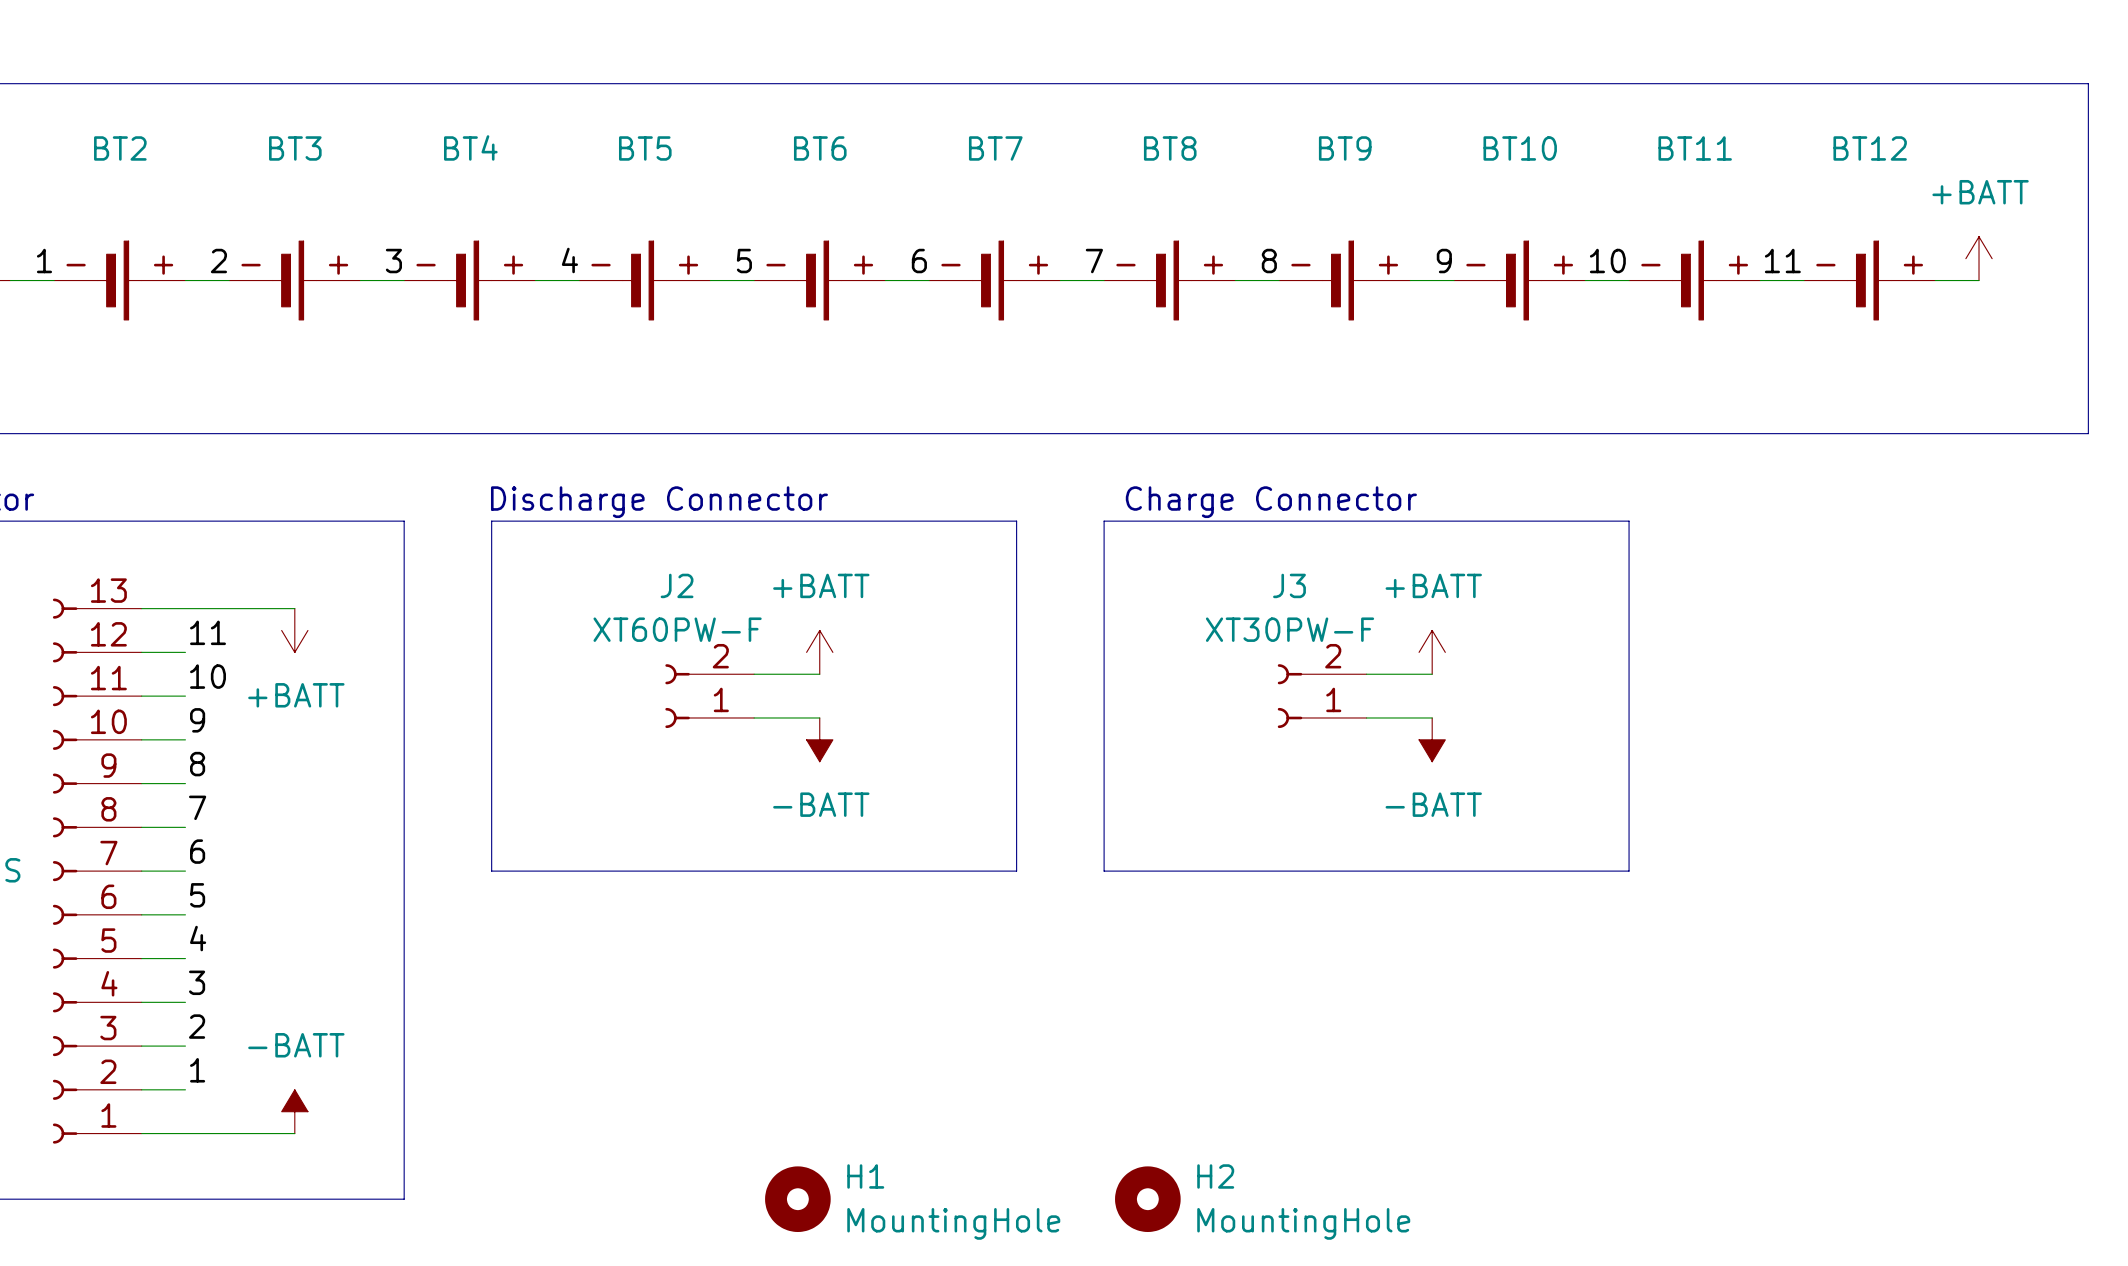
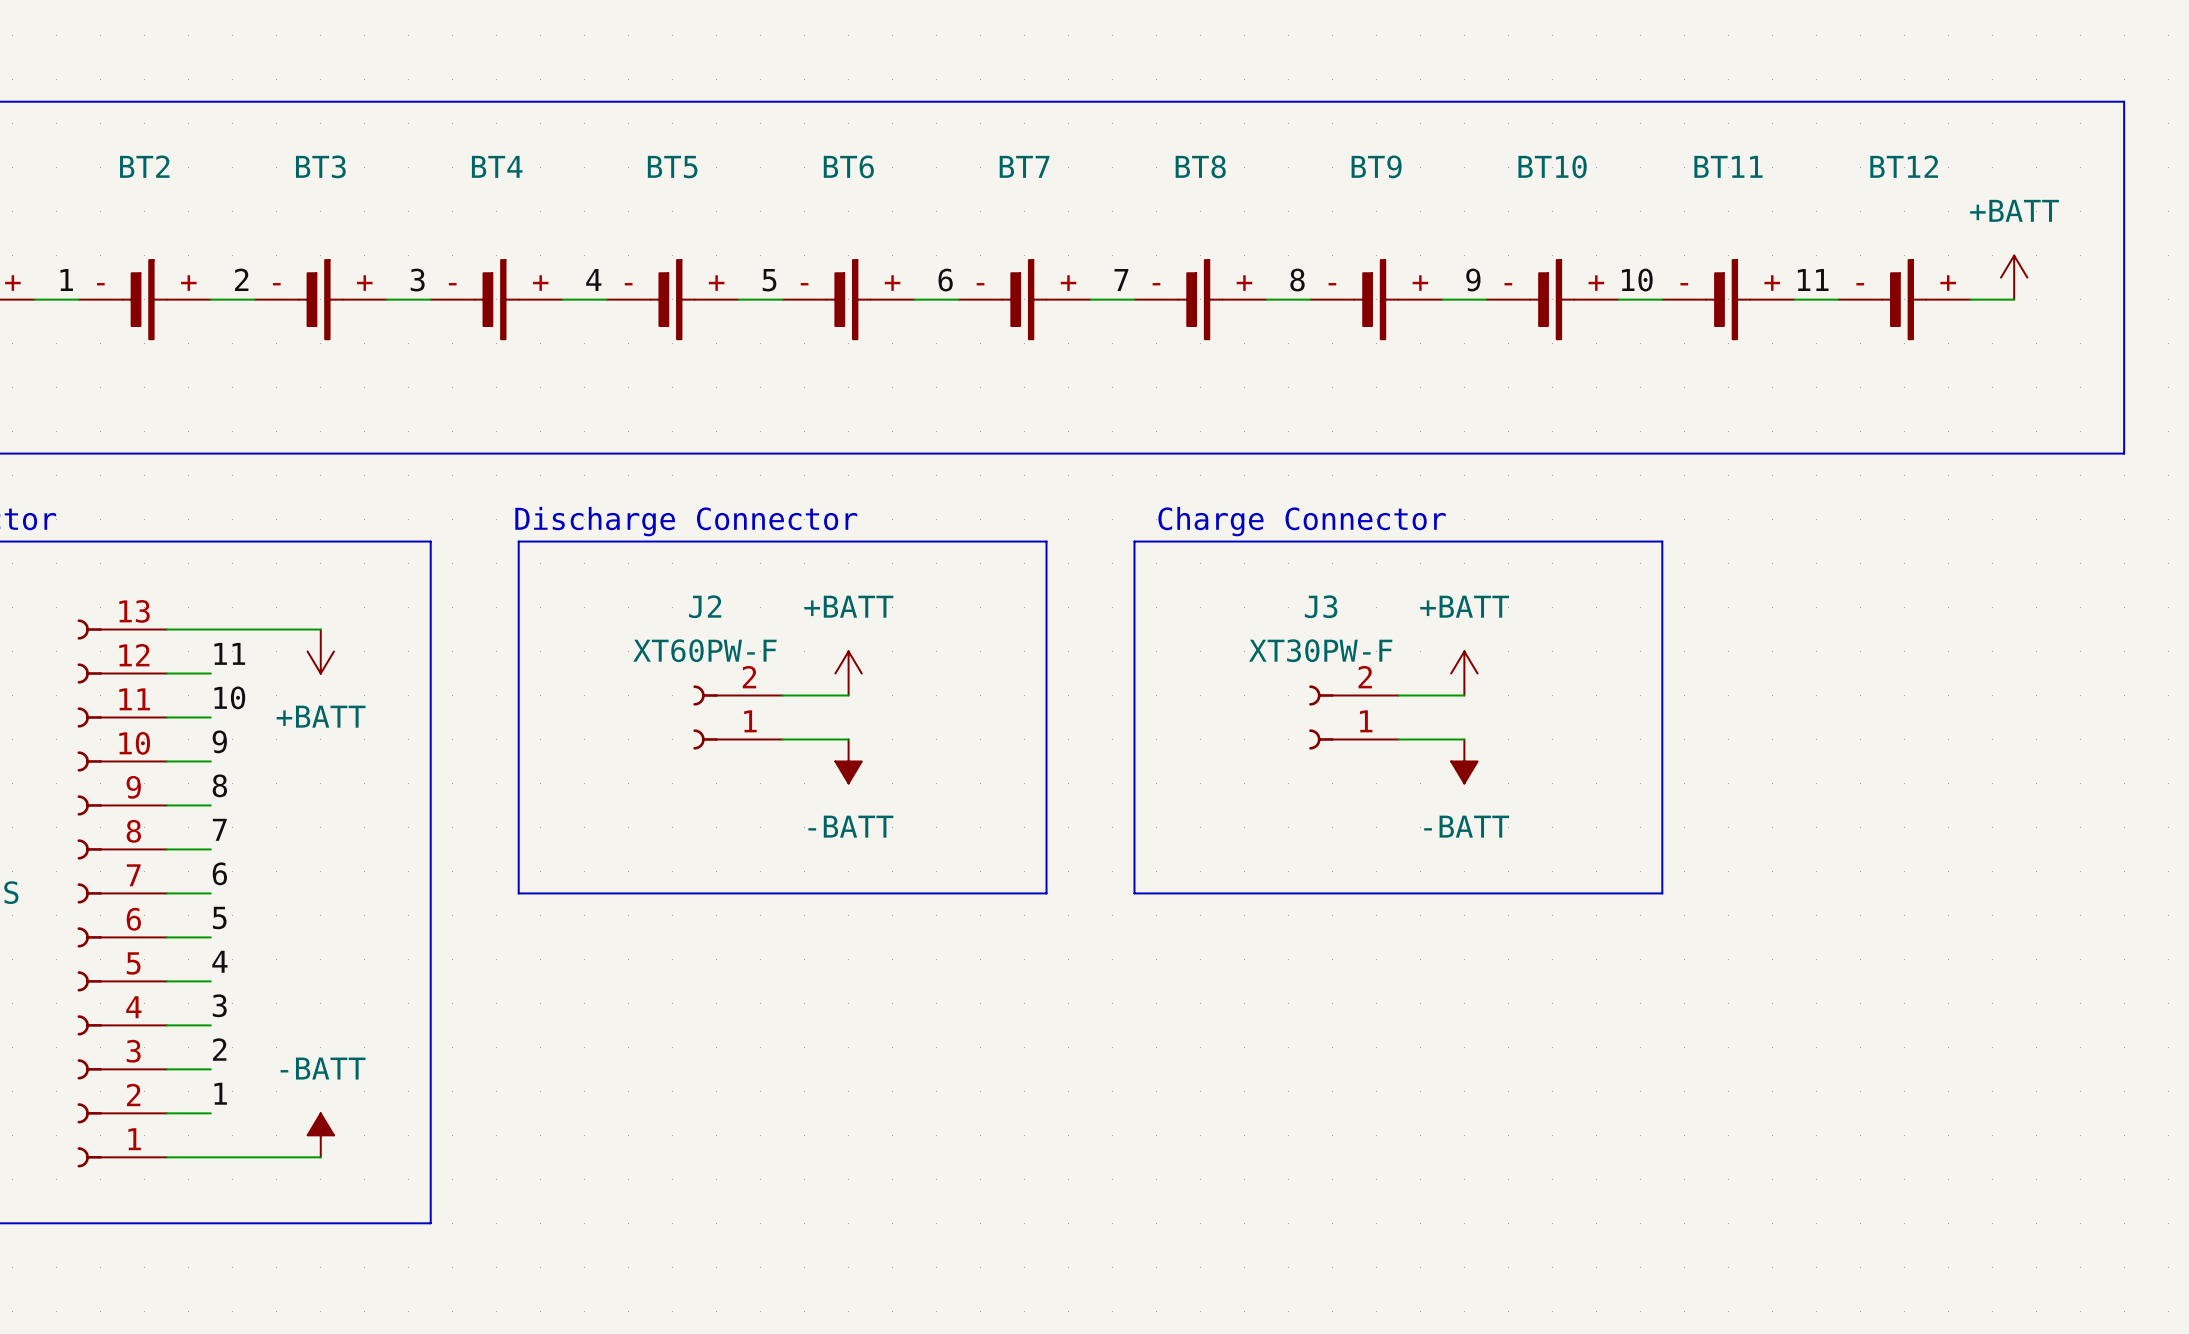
H1: MountingHole (797, 1199) -> none
H2: MountingHole (1147, 1199) -> none

